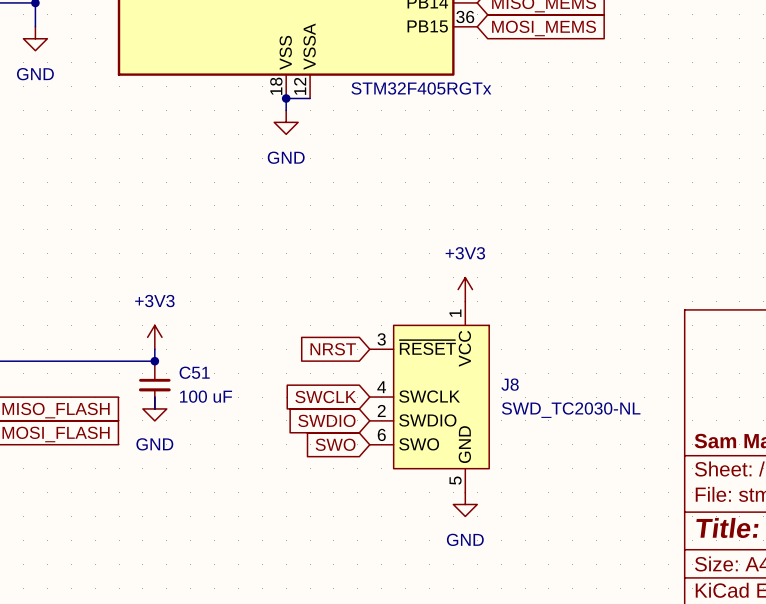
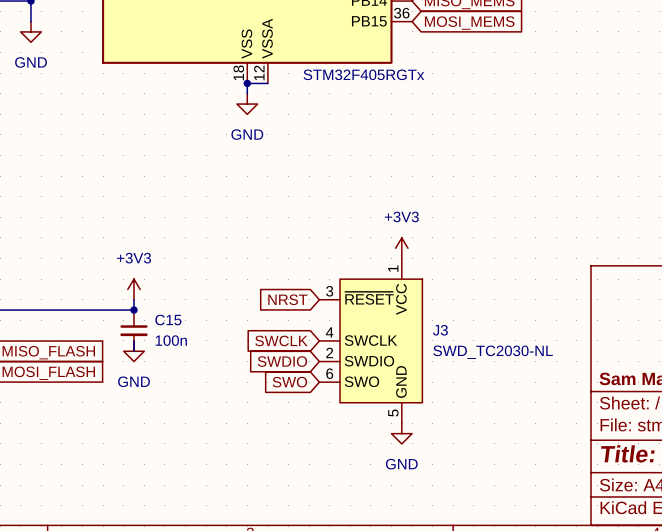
C51 name: C51 (194, 372) -> C15 (168, 320)
J8 name: J8 (510, 384) -> J3 (440, 330)
C51 value: 100 uF (206, 396) -> 100n (171, 340)

